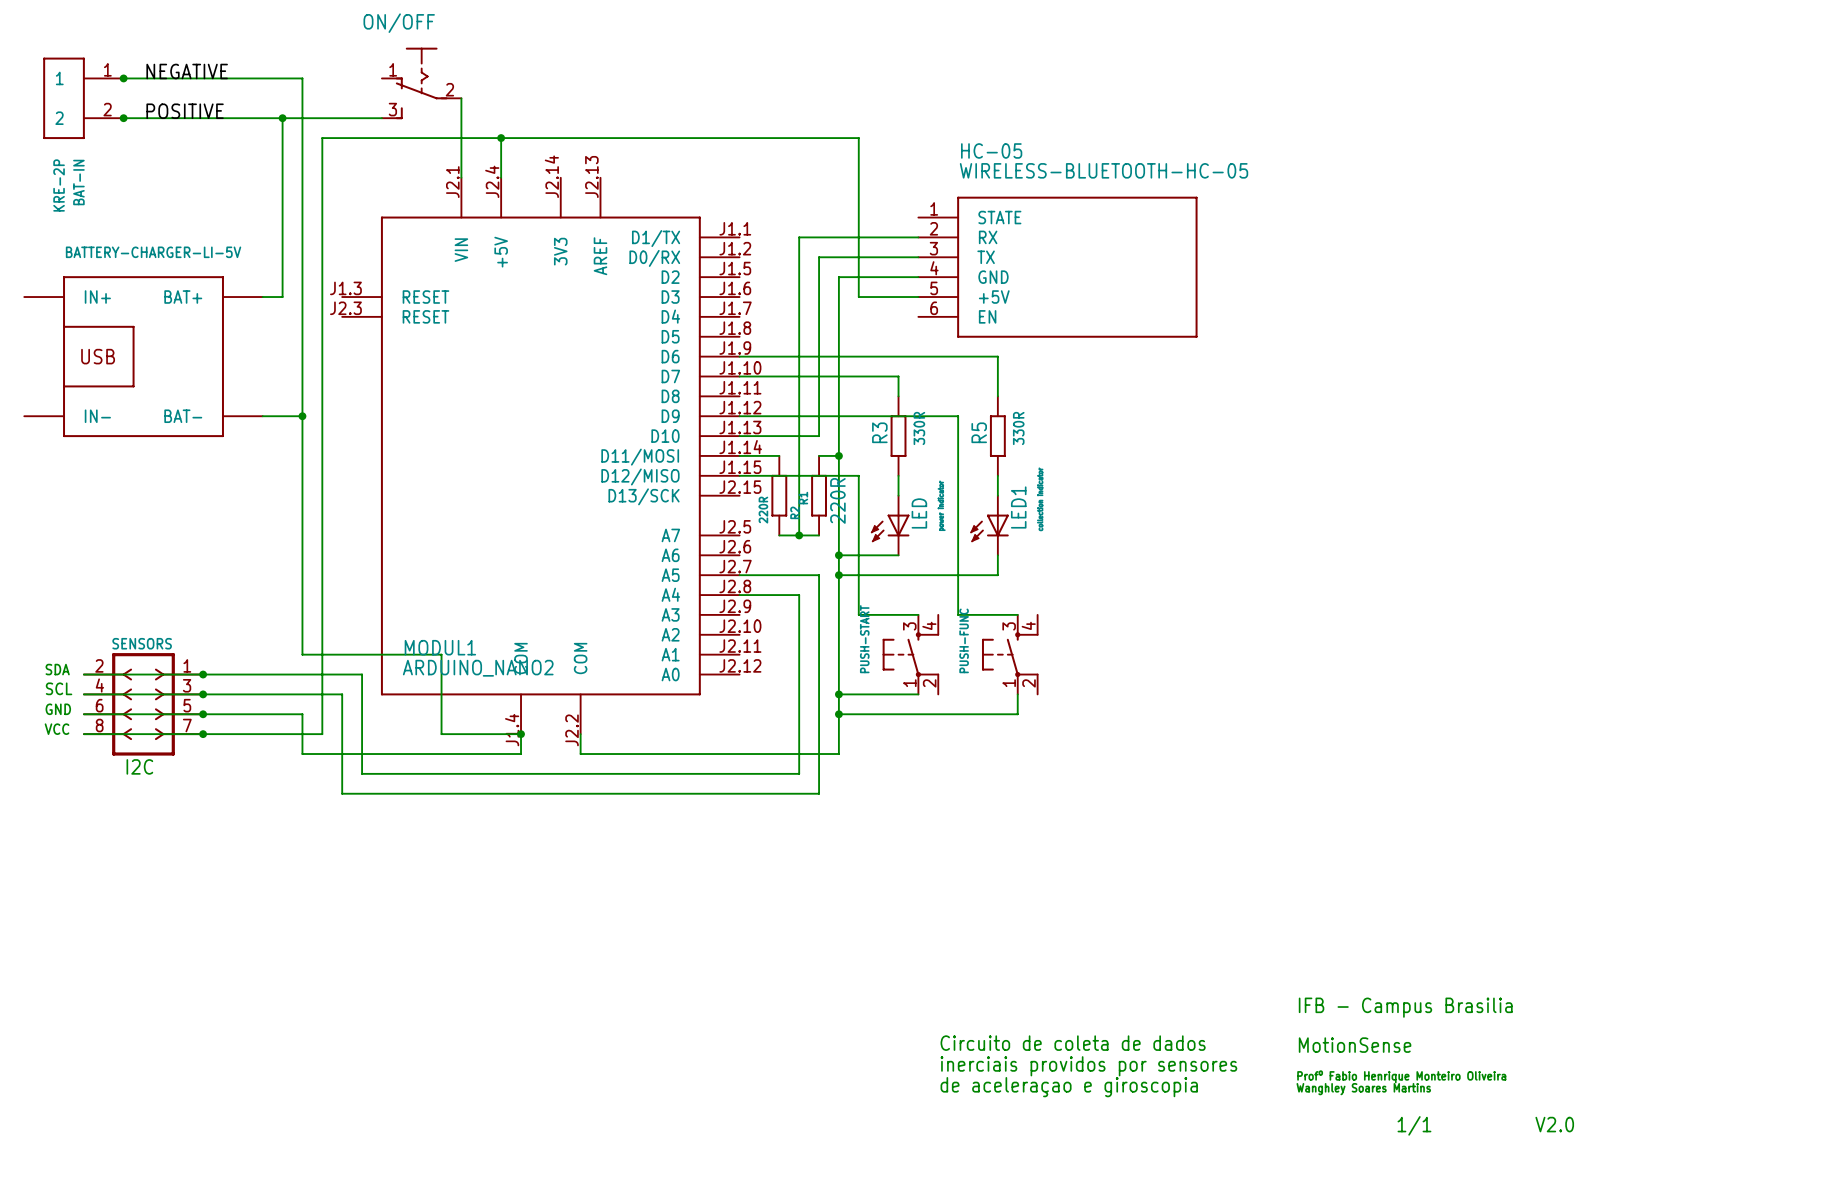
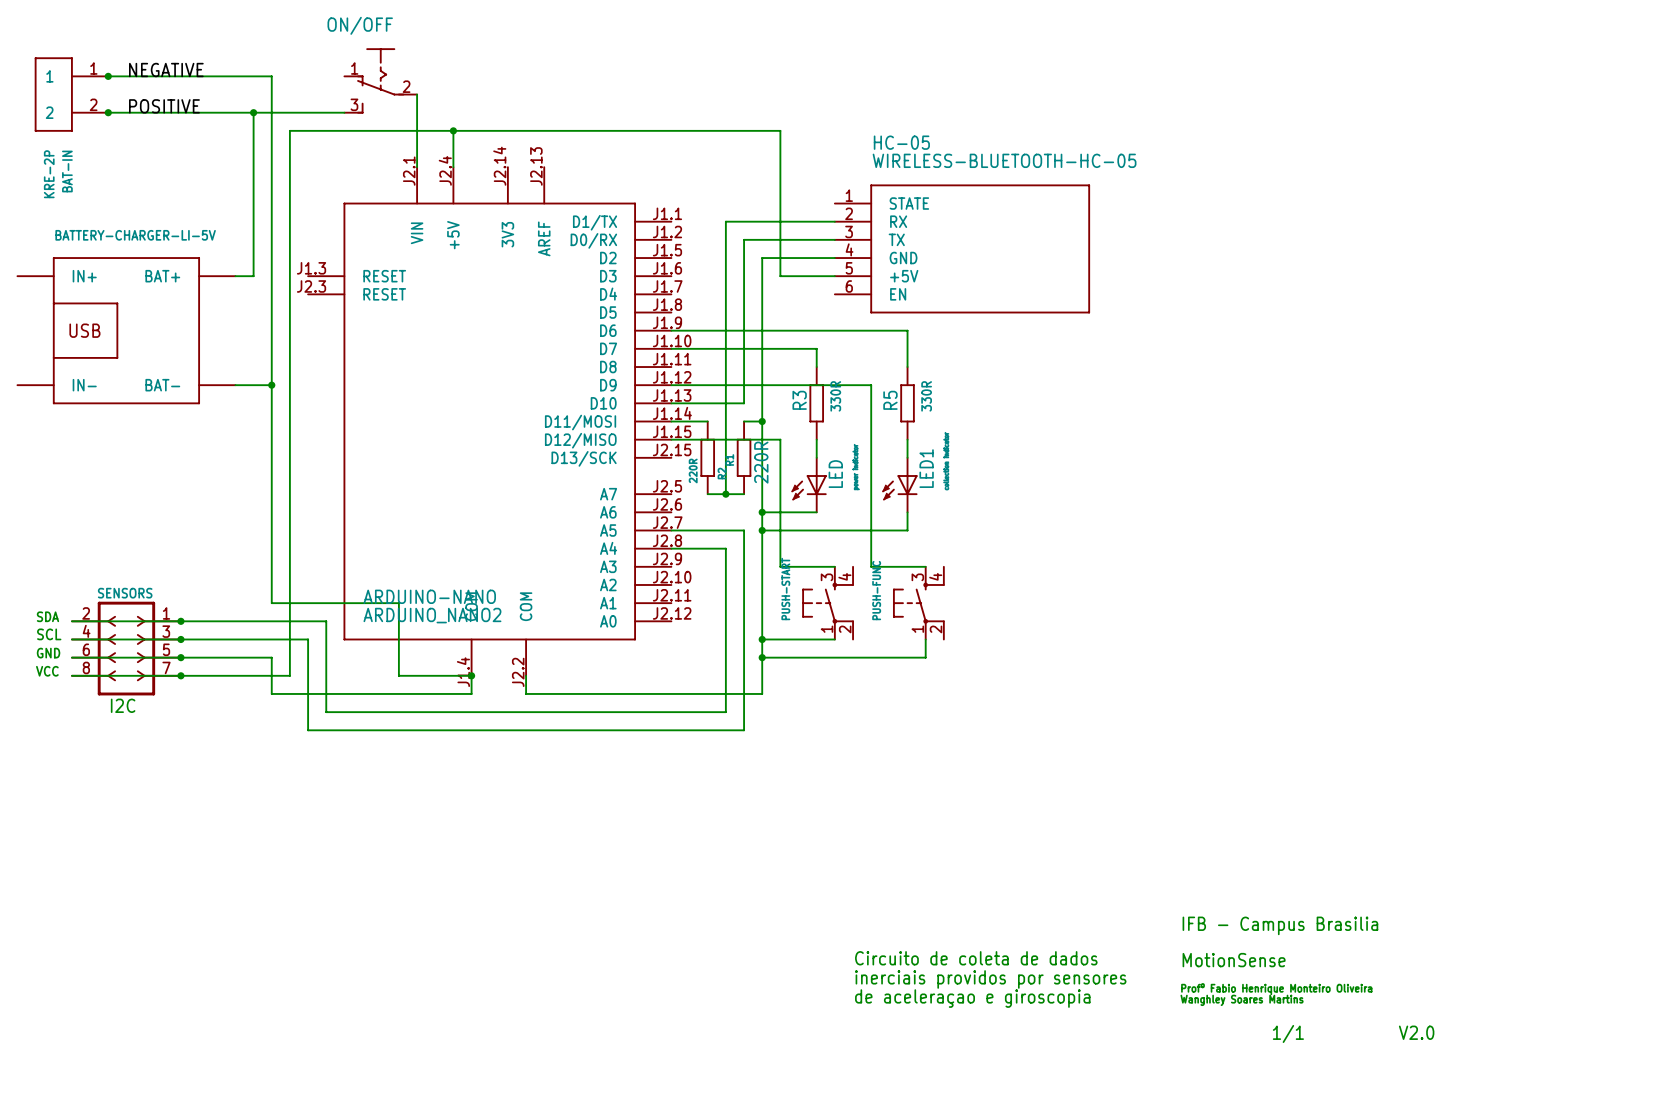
MODUL1 name: MODUL1 (440, 647) -> ARDUINO-NANO (429, 596)

